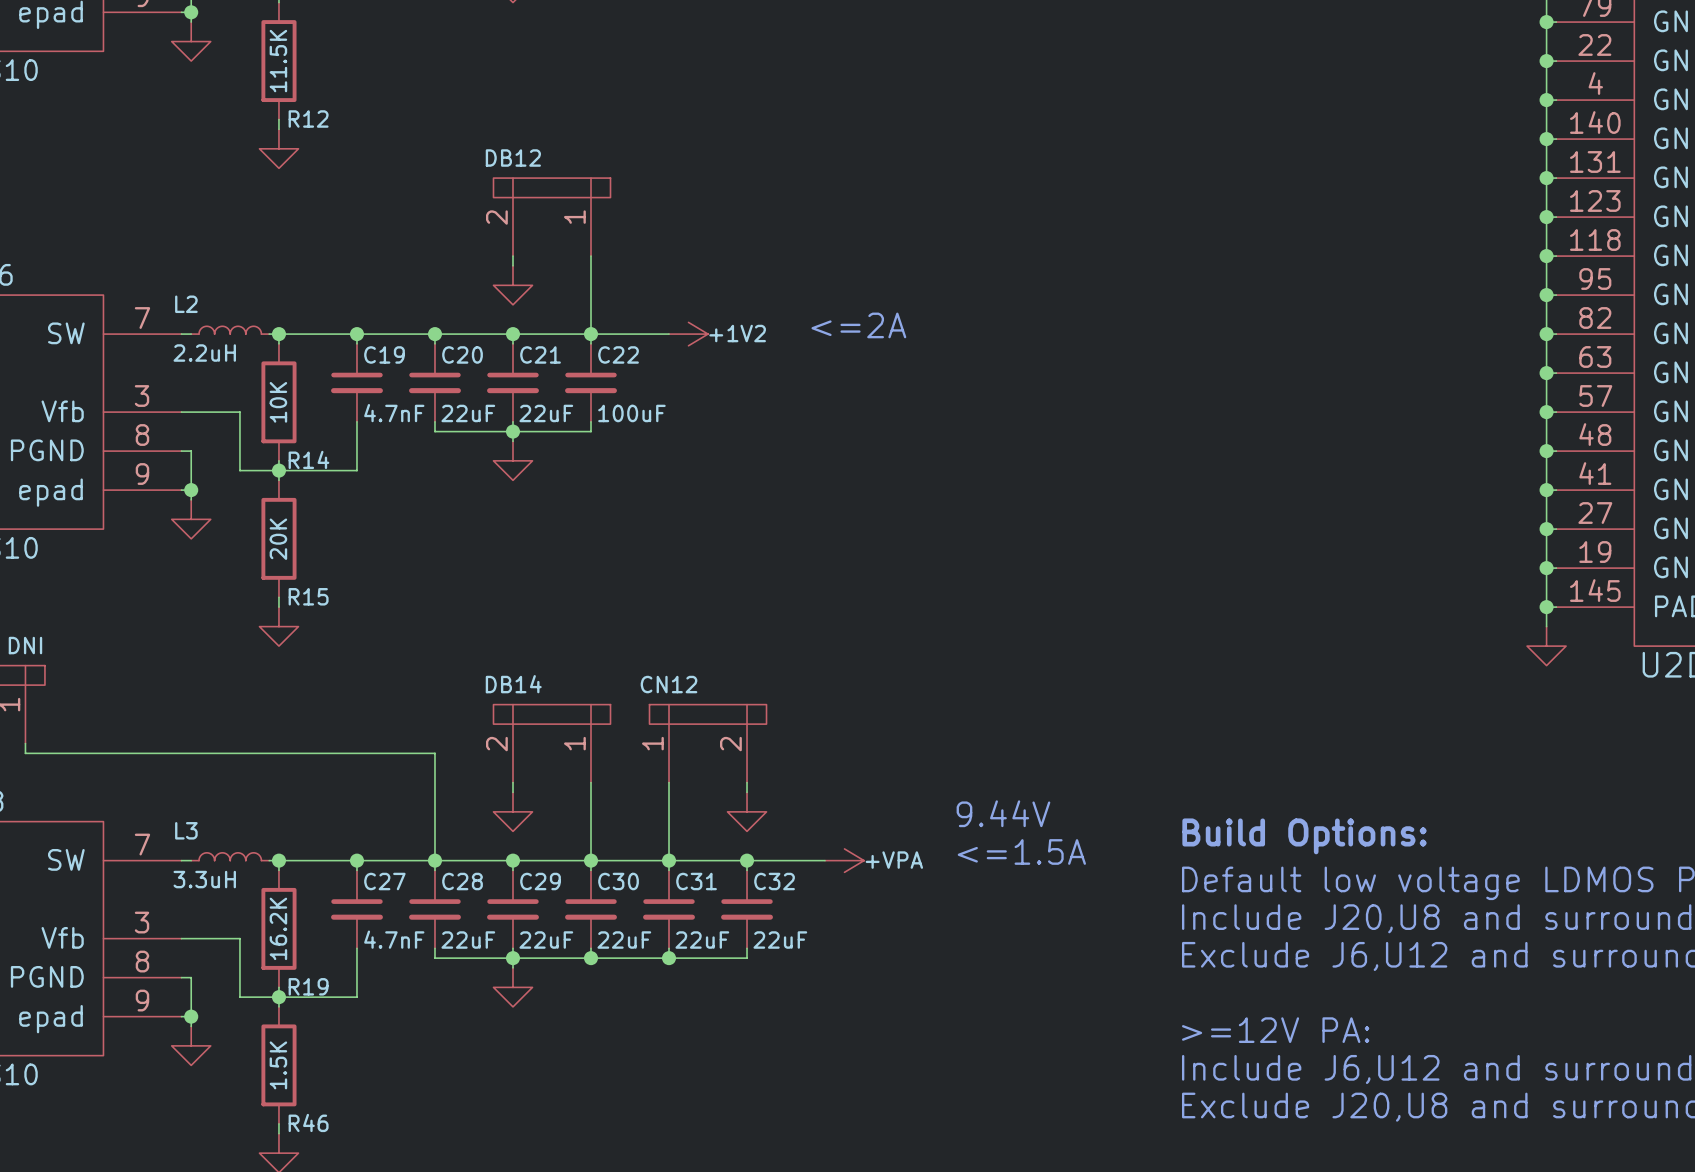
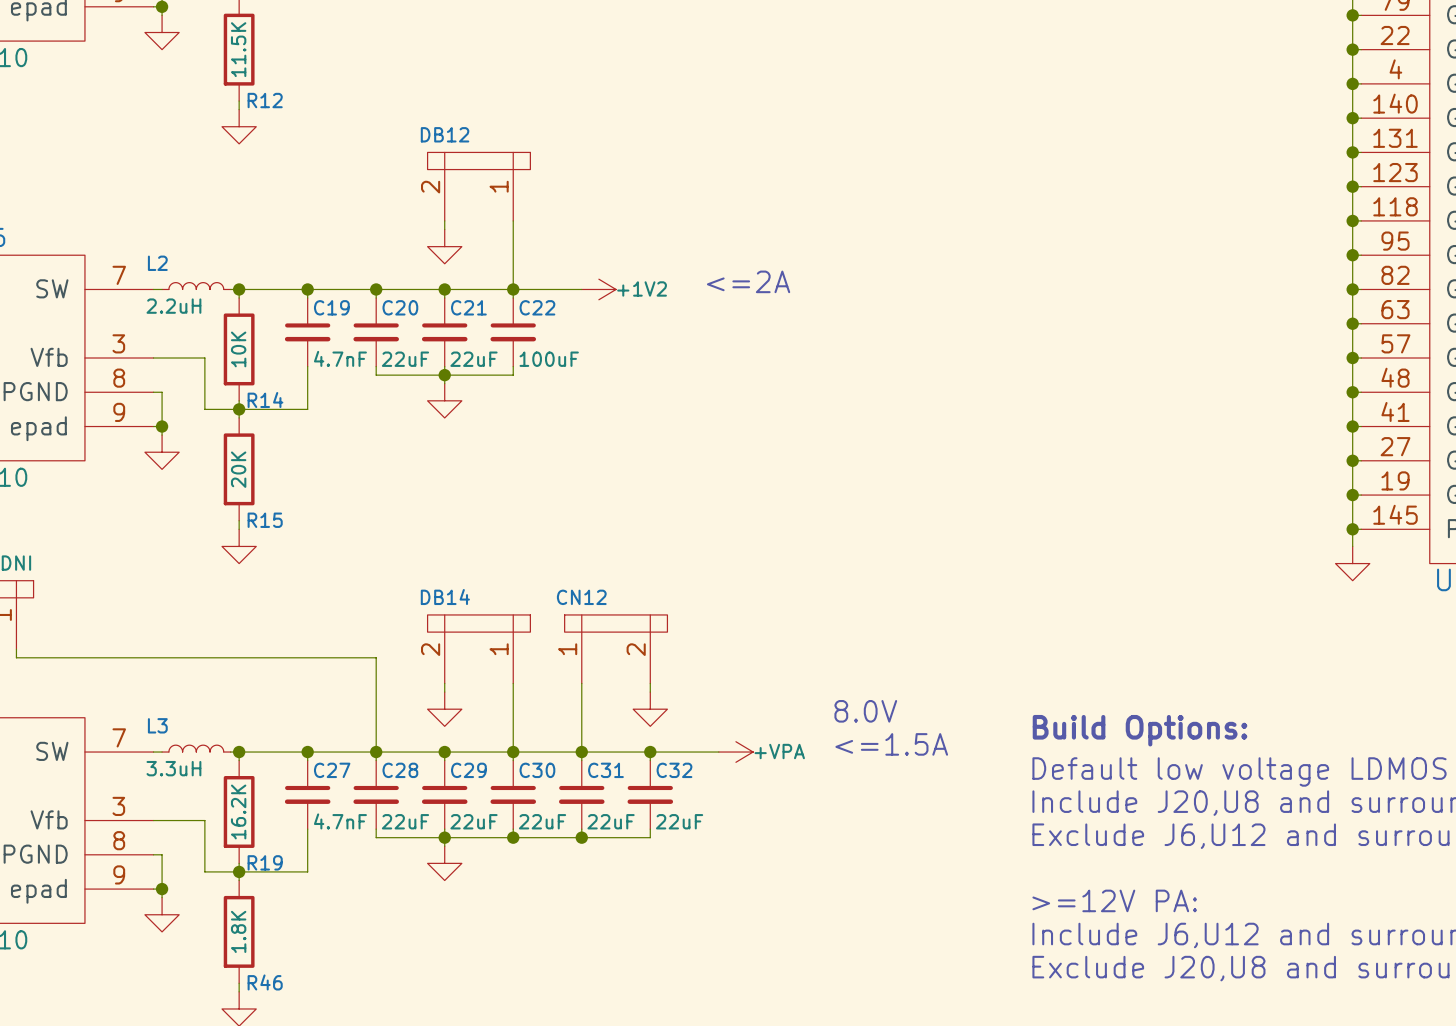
text: 9.44V (1003, 813) -> 8.0V (865, 711)
R46 value: 1.5K (278, 1065) -> 1.8K (238, 931)

